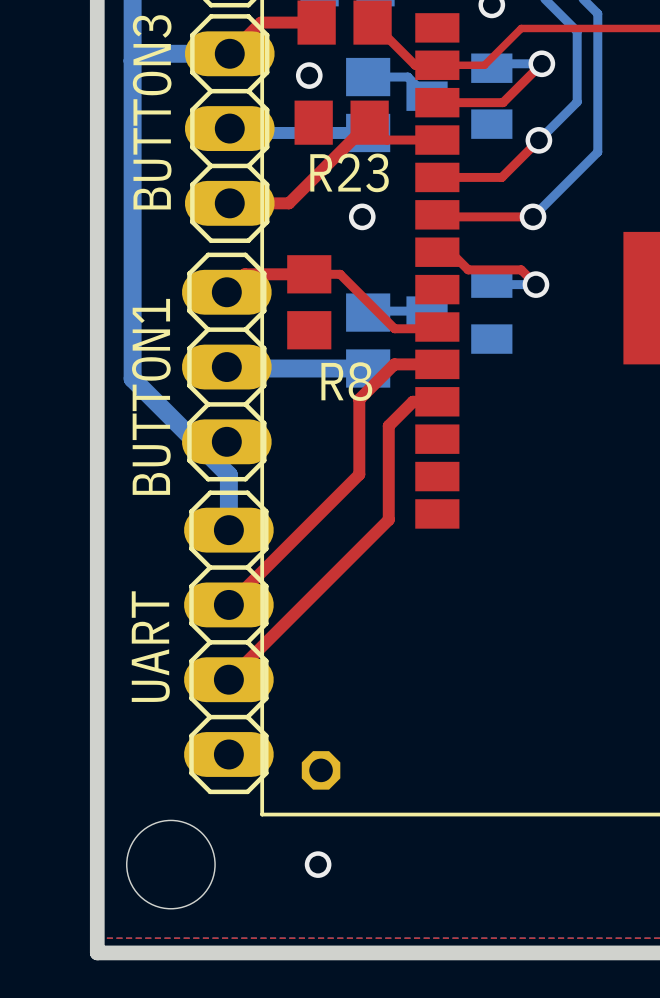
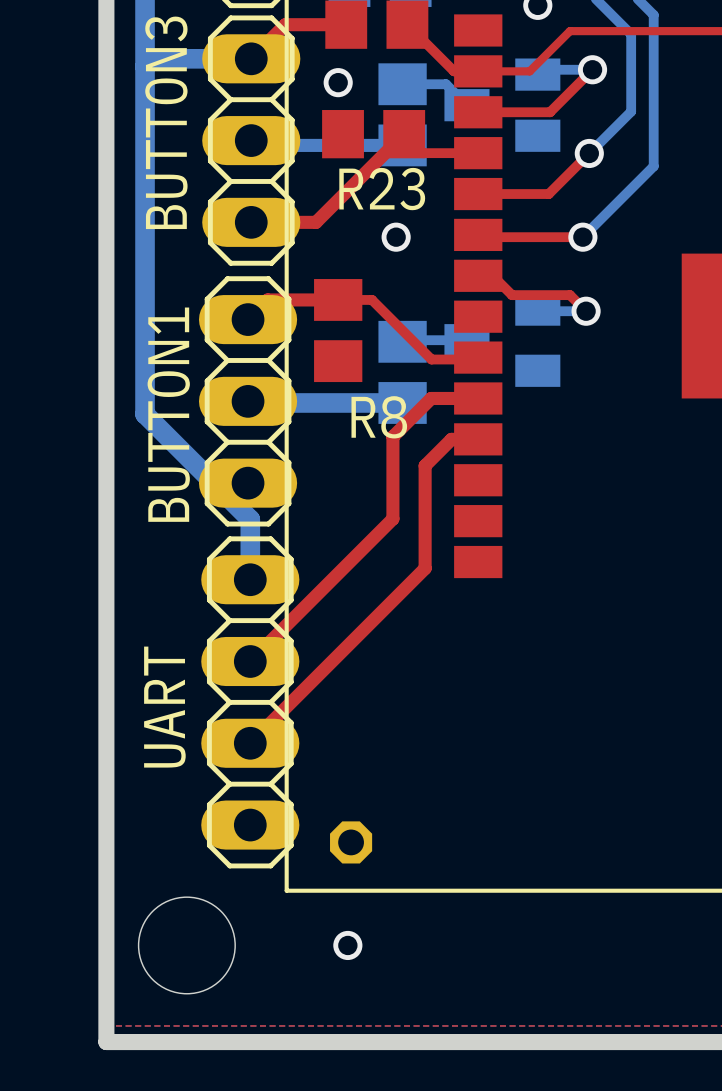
BUTTON1 name position: BUTTON1 (151, 396) -> BUTTON1 (168, 414)

